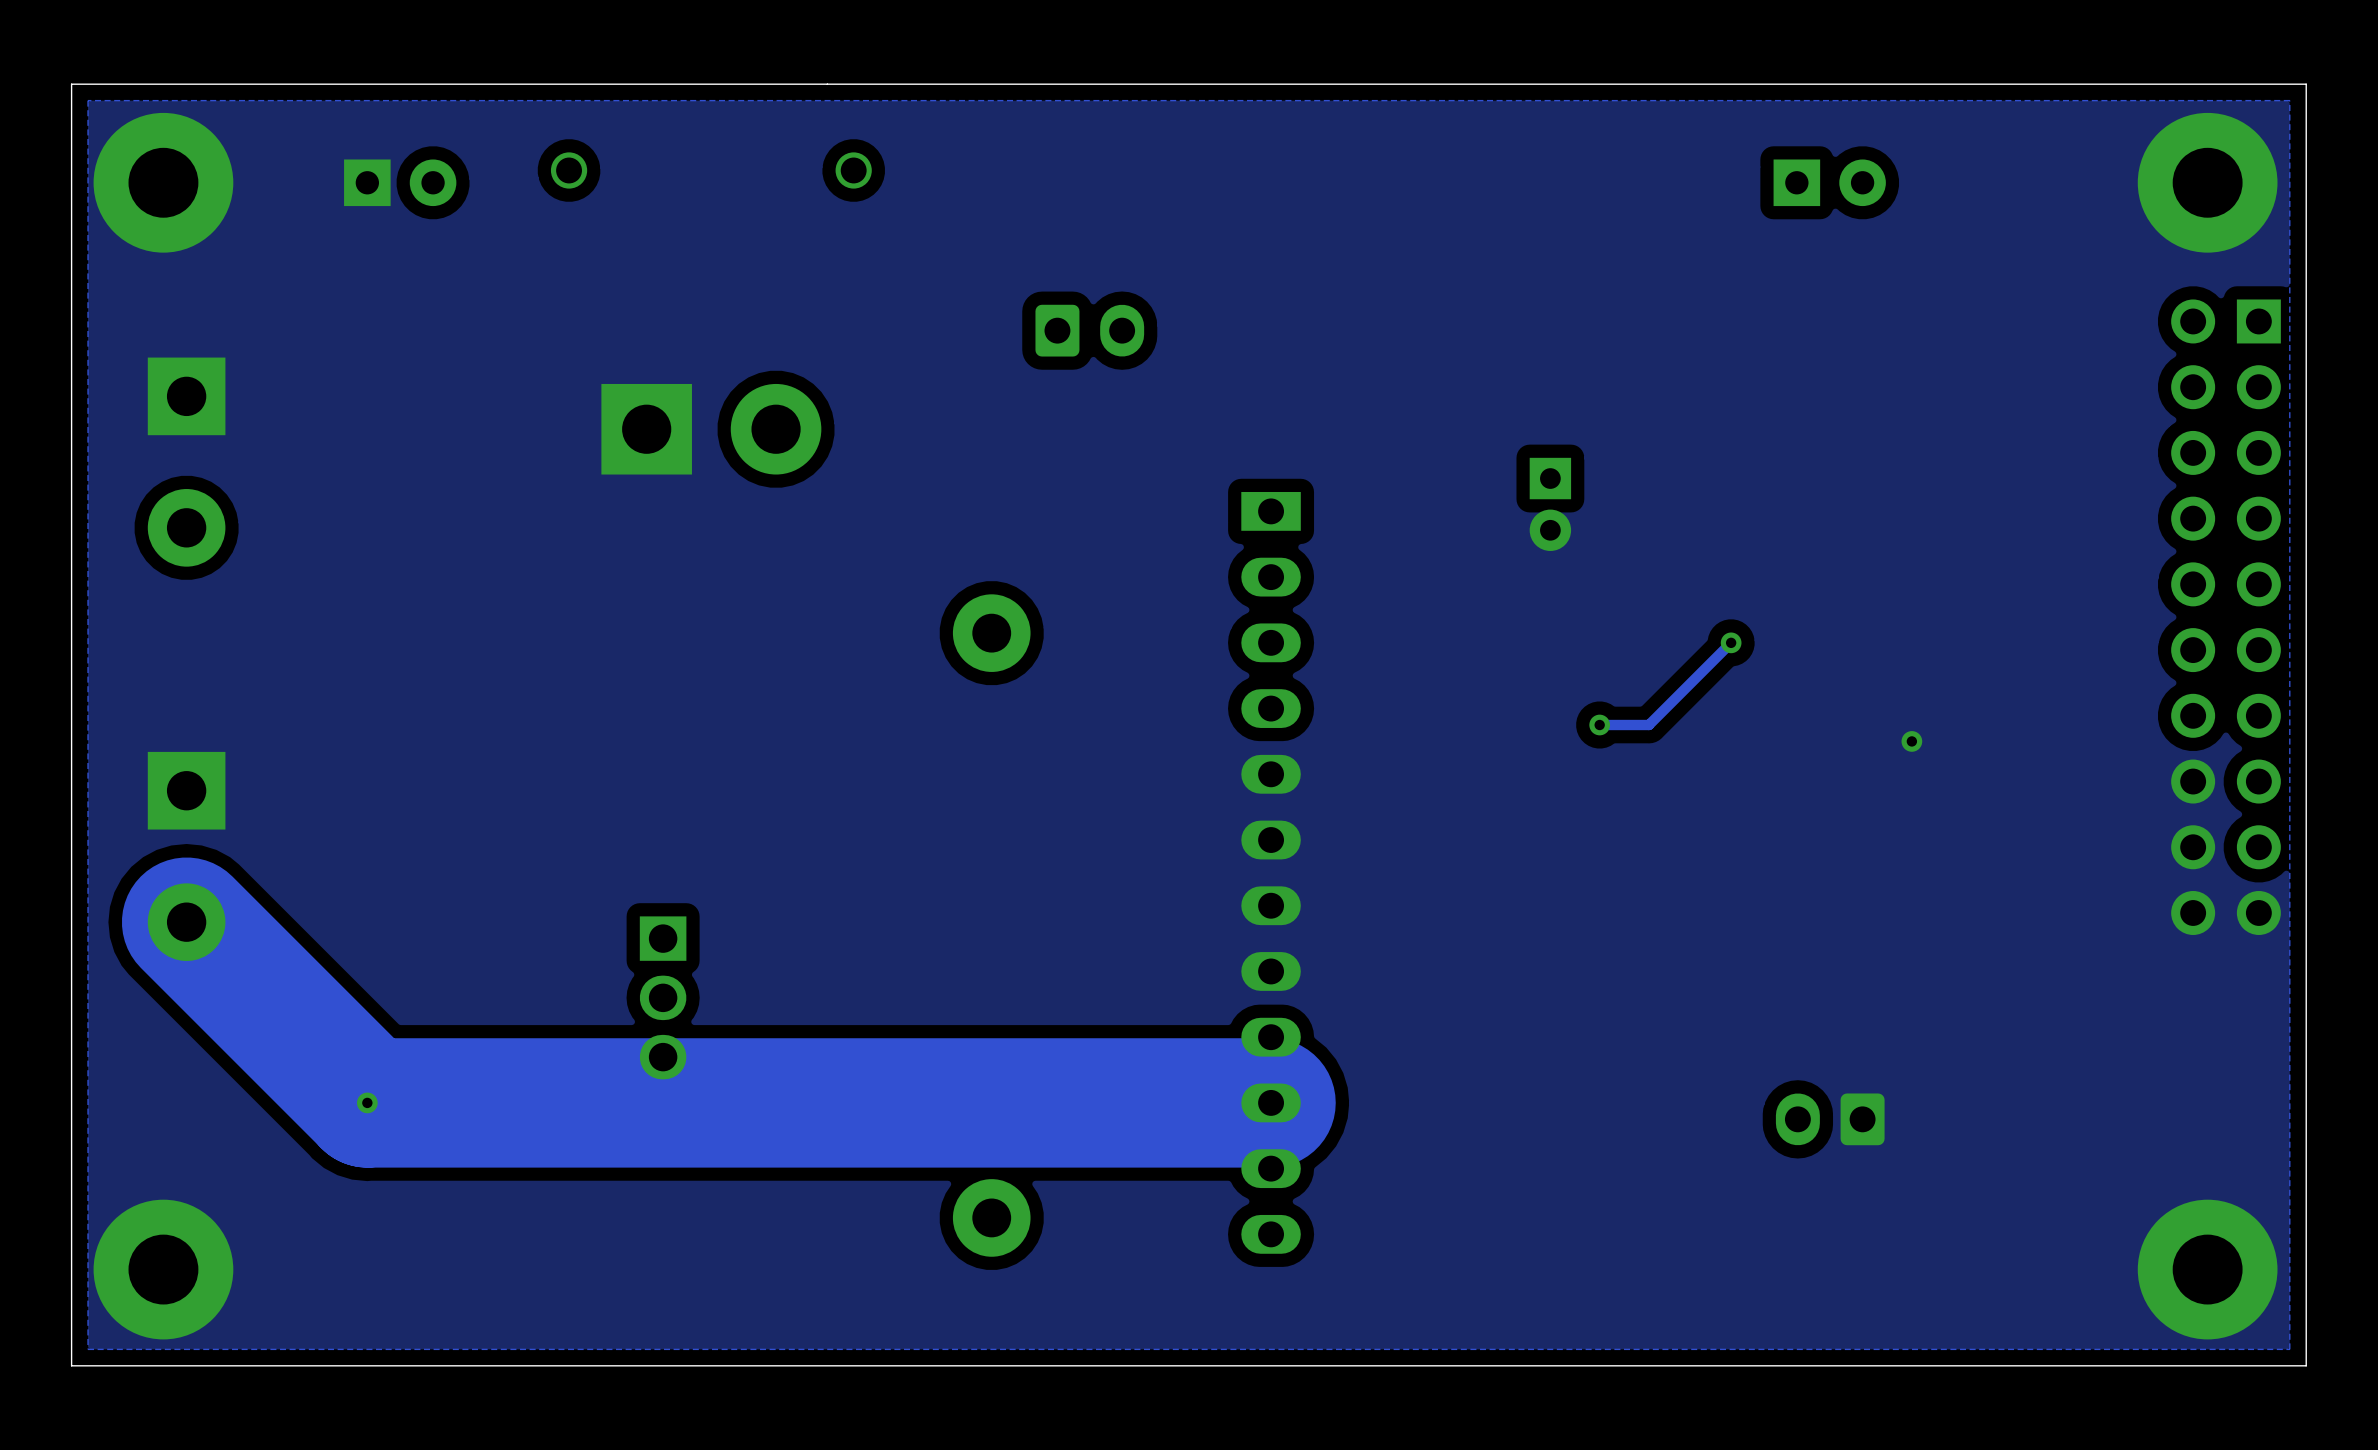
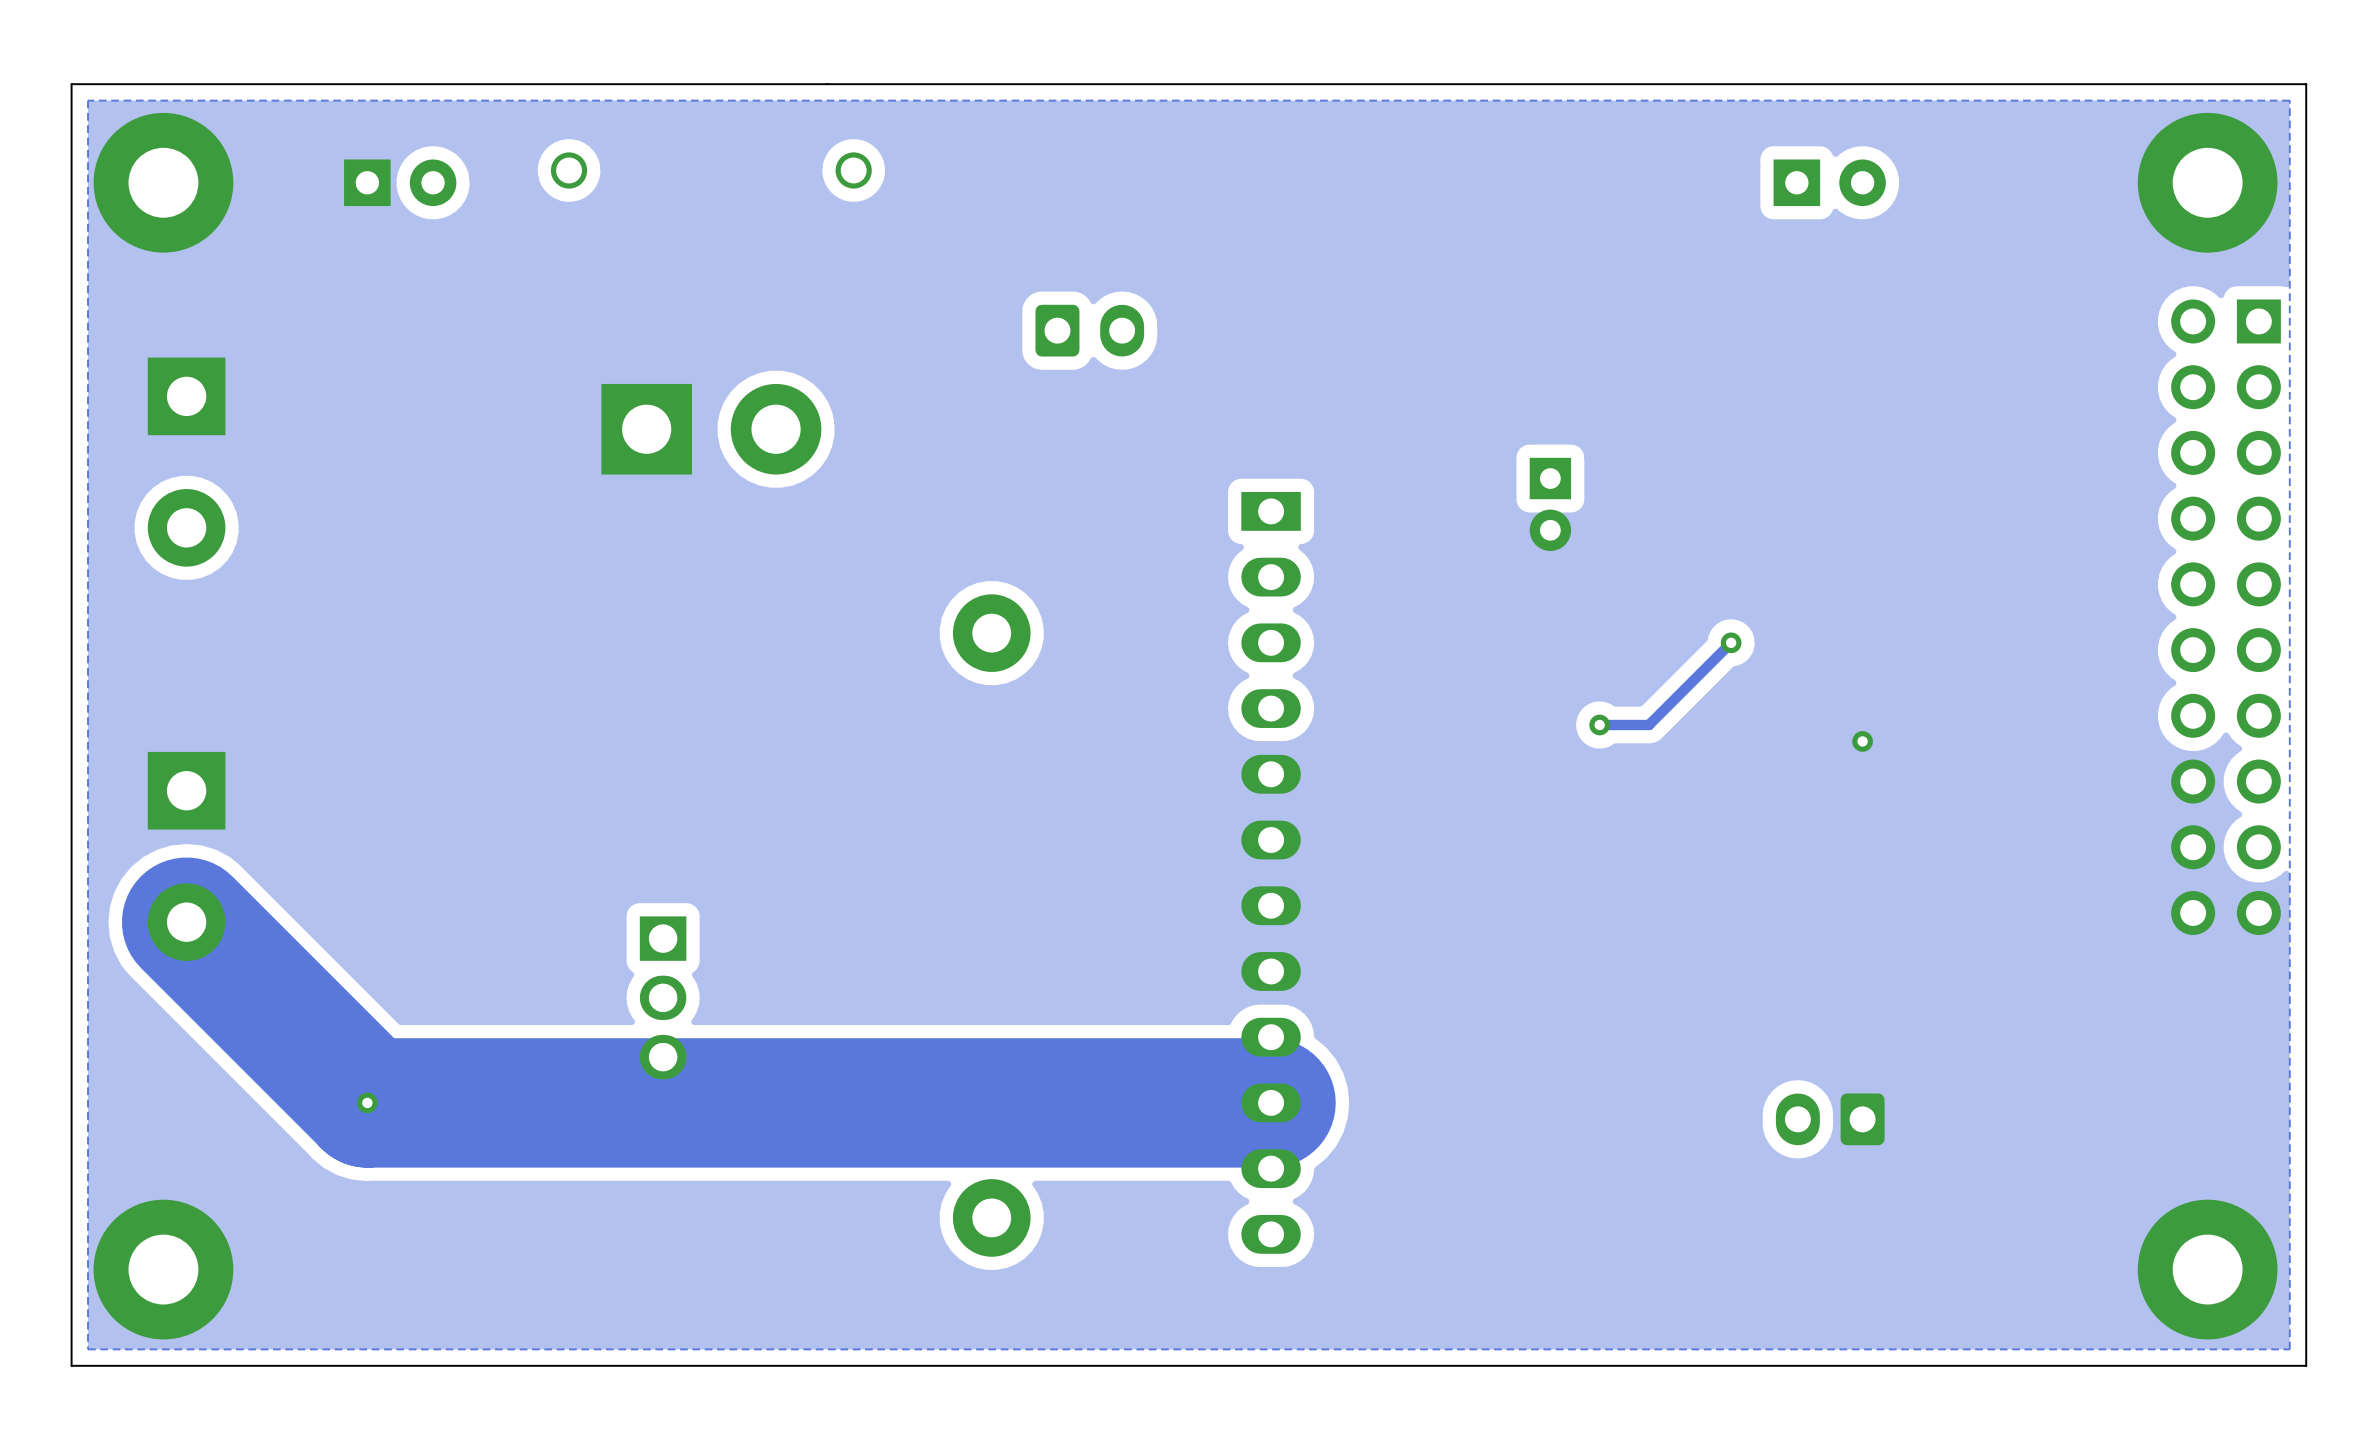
via position: (1911, 741) -> (1862, 741)

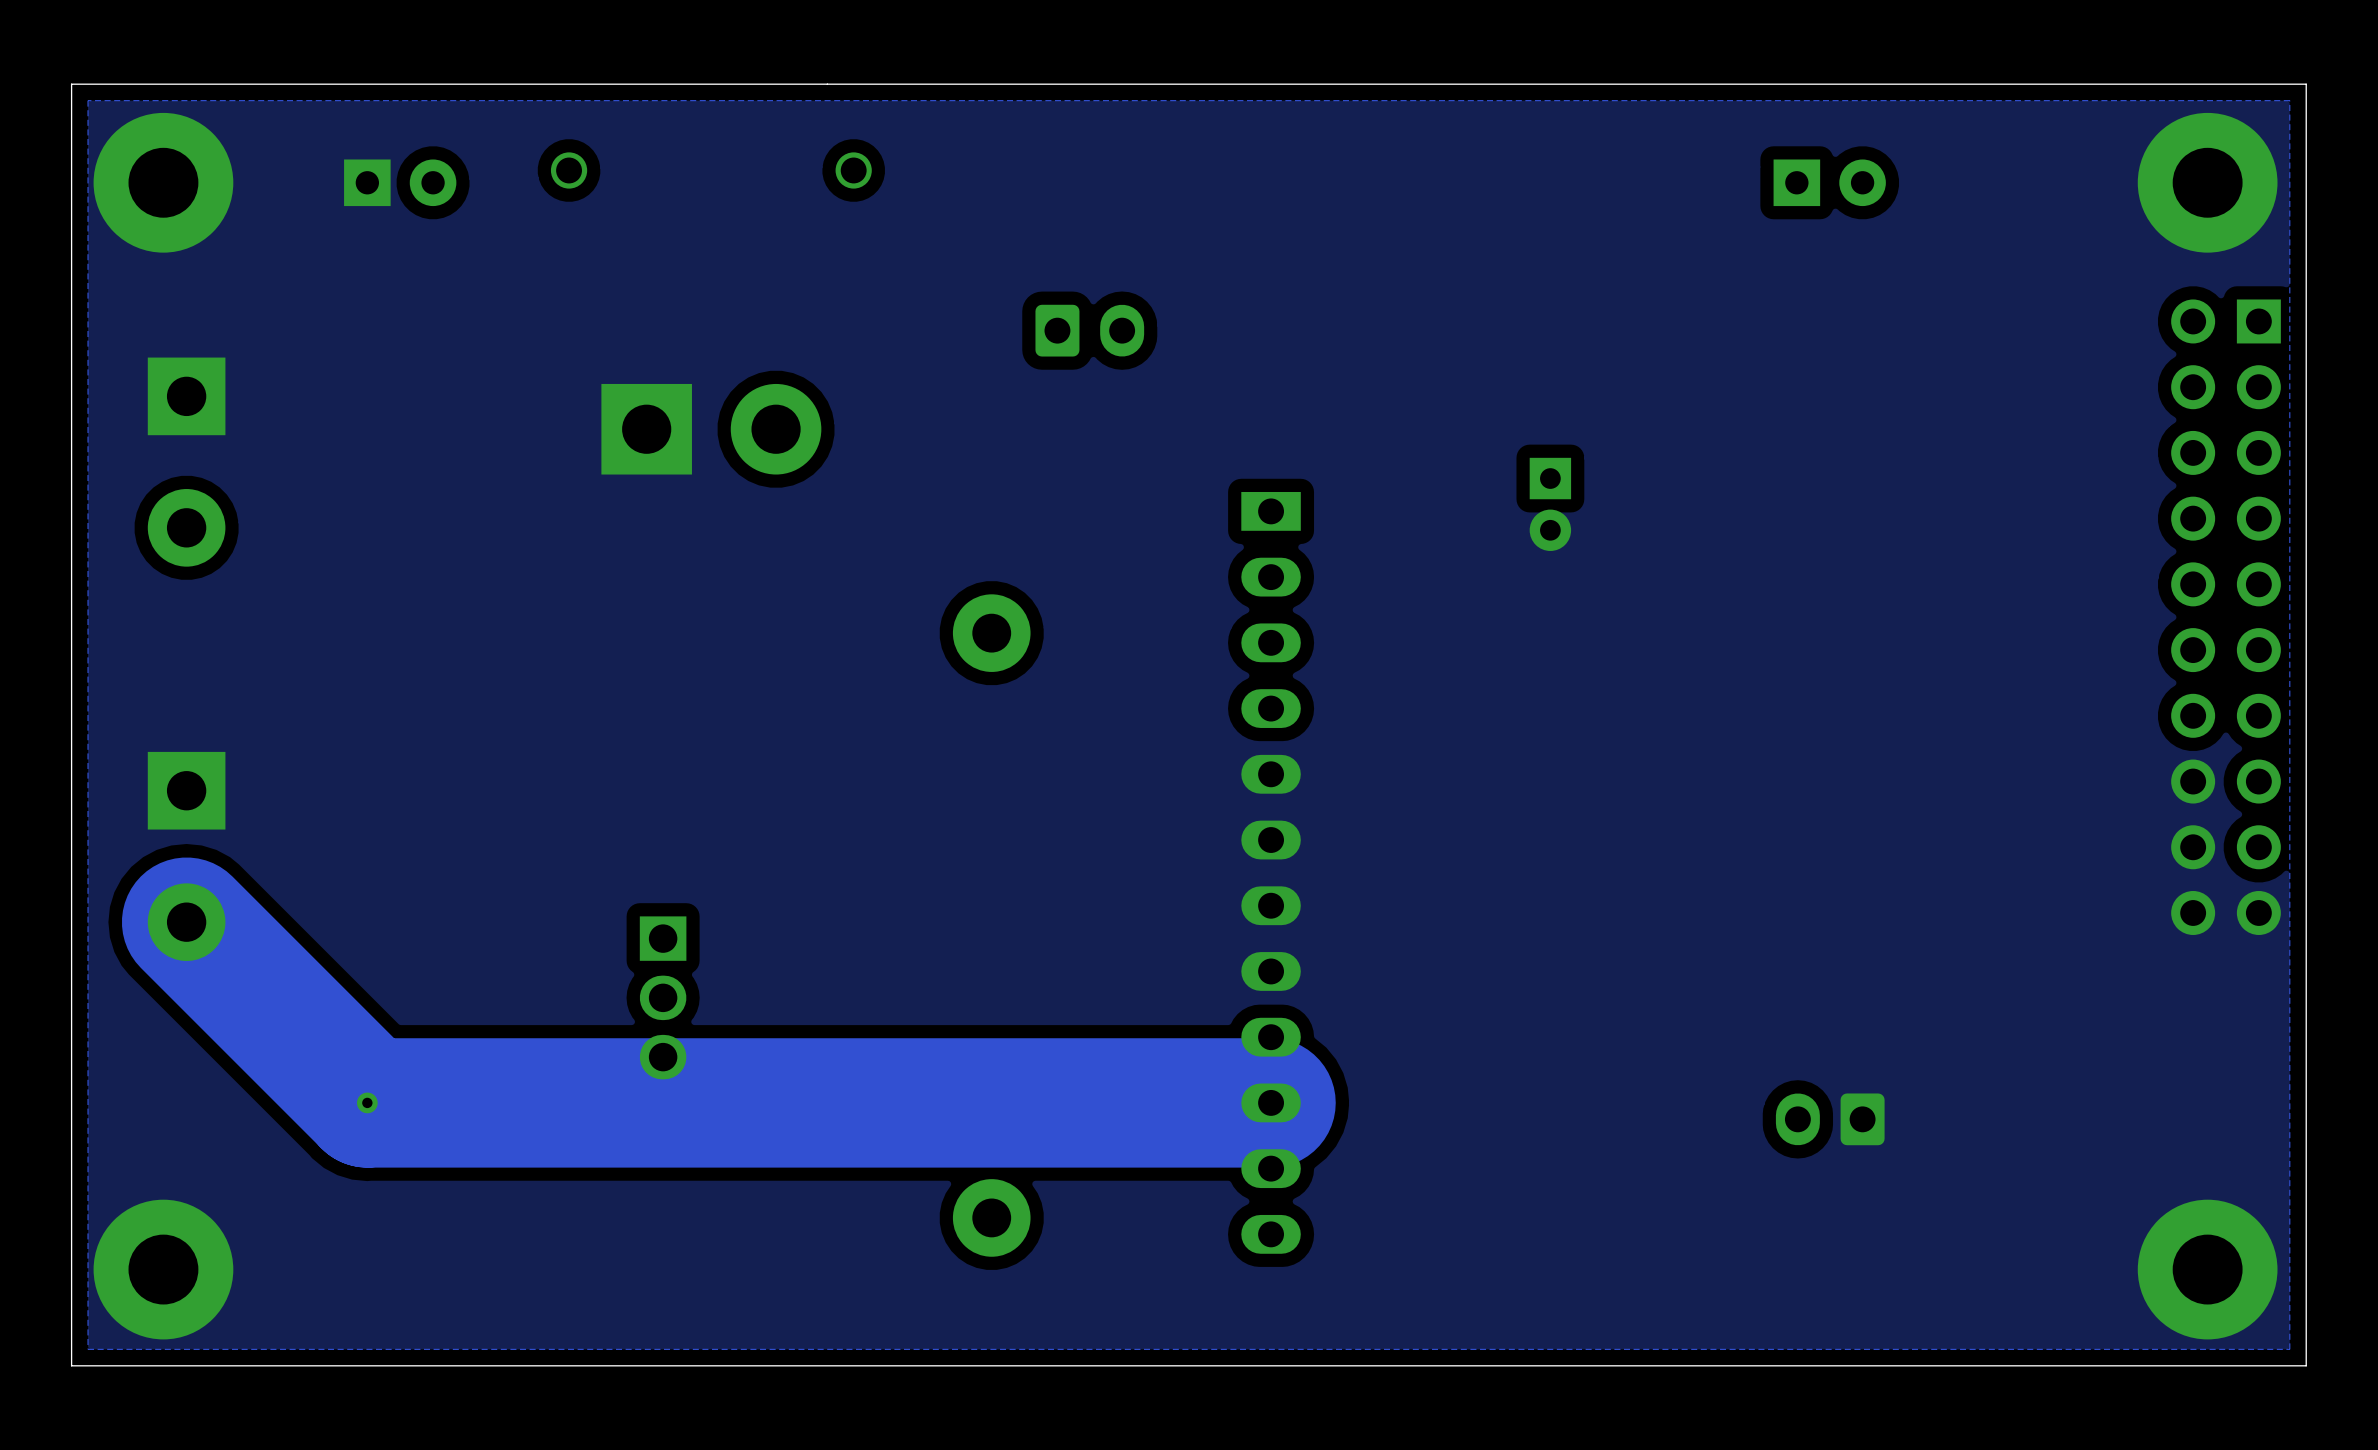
track: (1731, 642) (1648, 725) (1599, 725) -> none
via: (1731, 642) -> none
via: (1599, 725) -> none
via: (1862, 741) -> none

